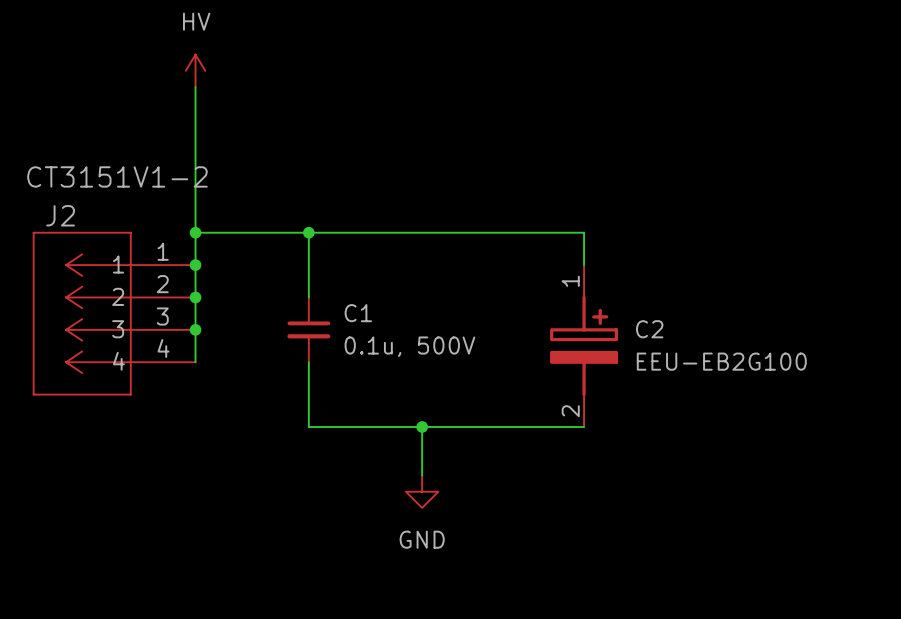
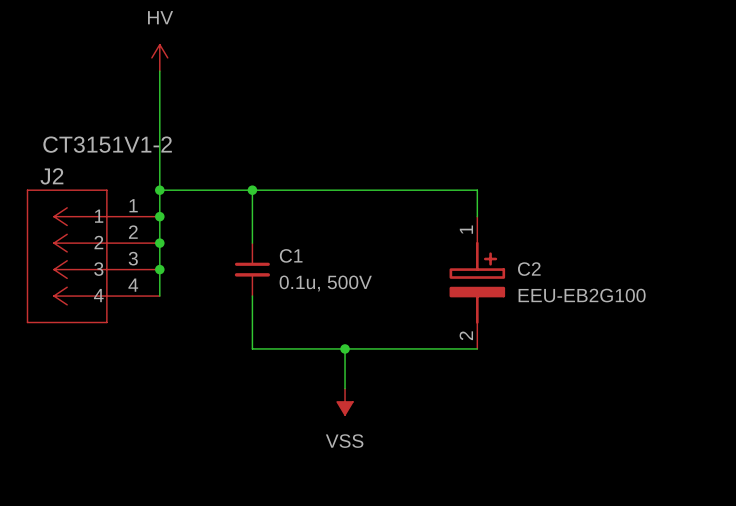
power symbol: GND (422, 491) -> VSS (345, 401)

